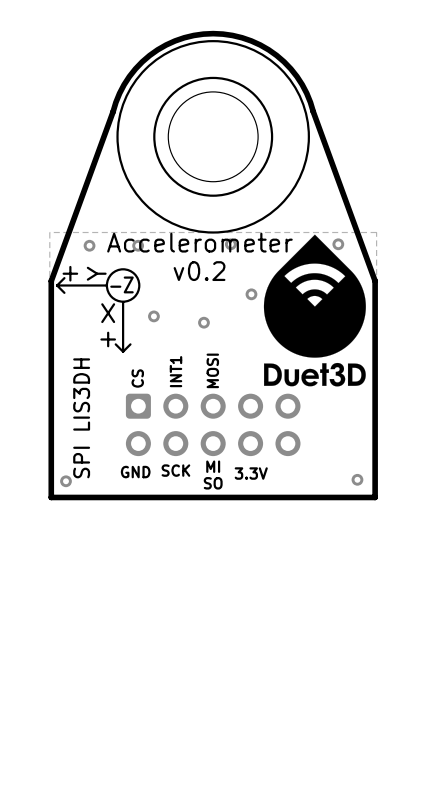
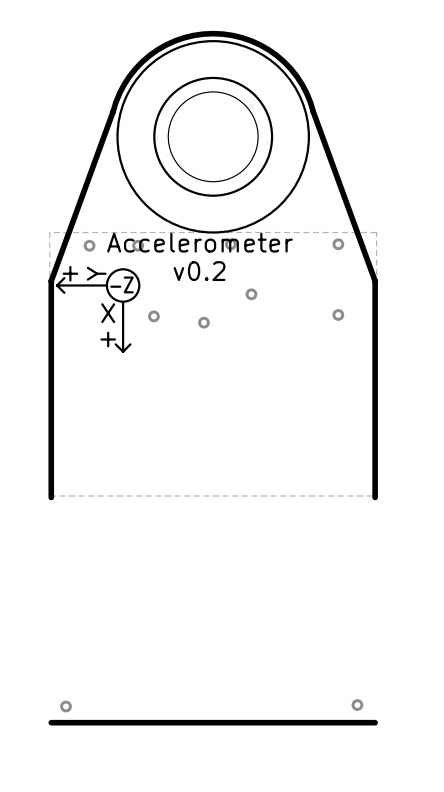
drawing: [263, 234, 366, 387] -> none
text: MOSI (212, 370) -> none
text: INT1 (176, 371) -> none
text: CS (137, 378) -> none
part: SPI LIS3DH (213, 424) -> none
text: MI (213, 466) -> none
text: SCK (175, 470) -> none
text: GND (135, 472) -> none
text: 3.3V (251, 473) -> none
via: (357, 479) -> none
via: (65, 481) -> none
text: SO (213, 483) -> none
board edge: (51, 497) (375, 497) -> (51, 722) (375, 722)
via: none -> (357, 705)
via: none -> (65, 706)

